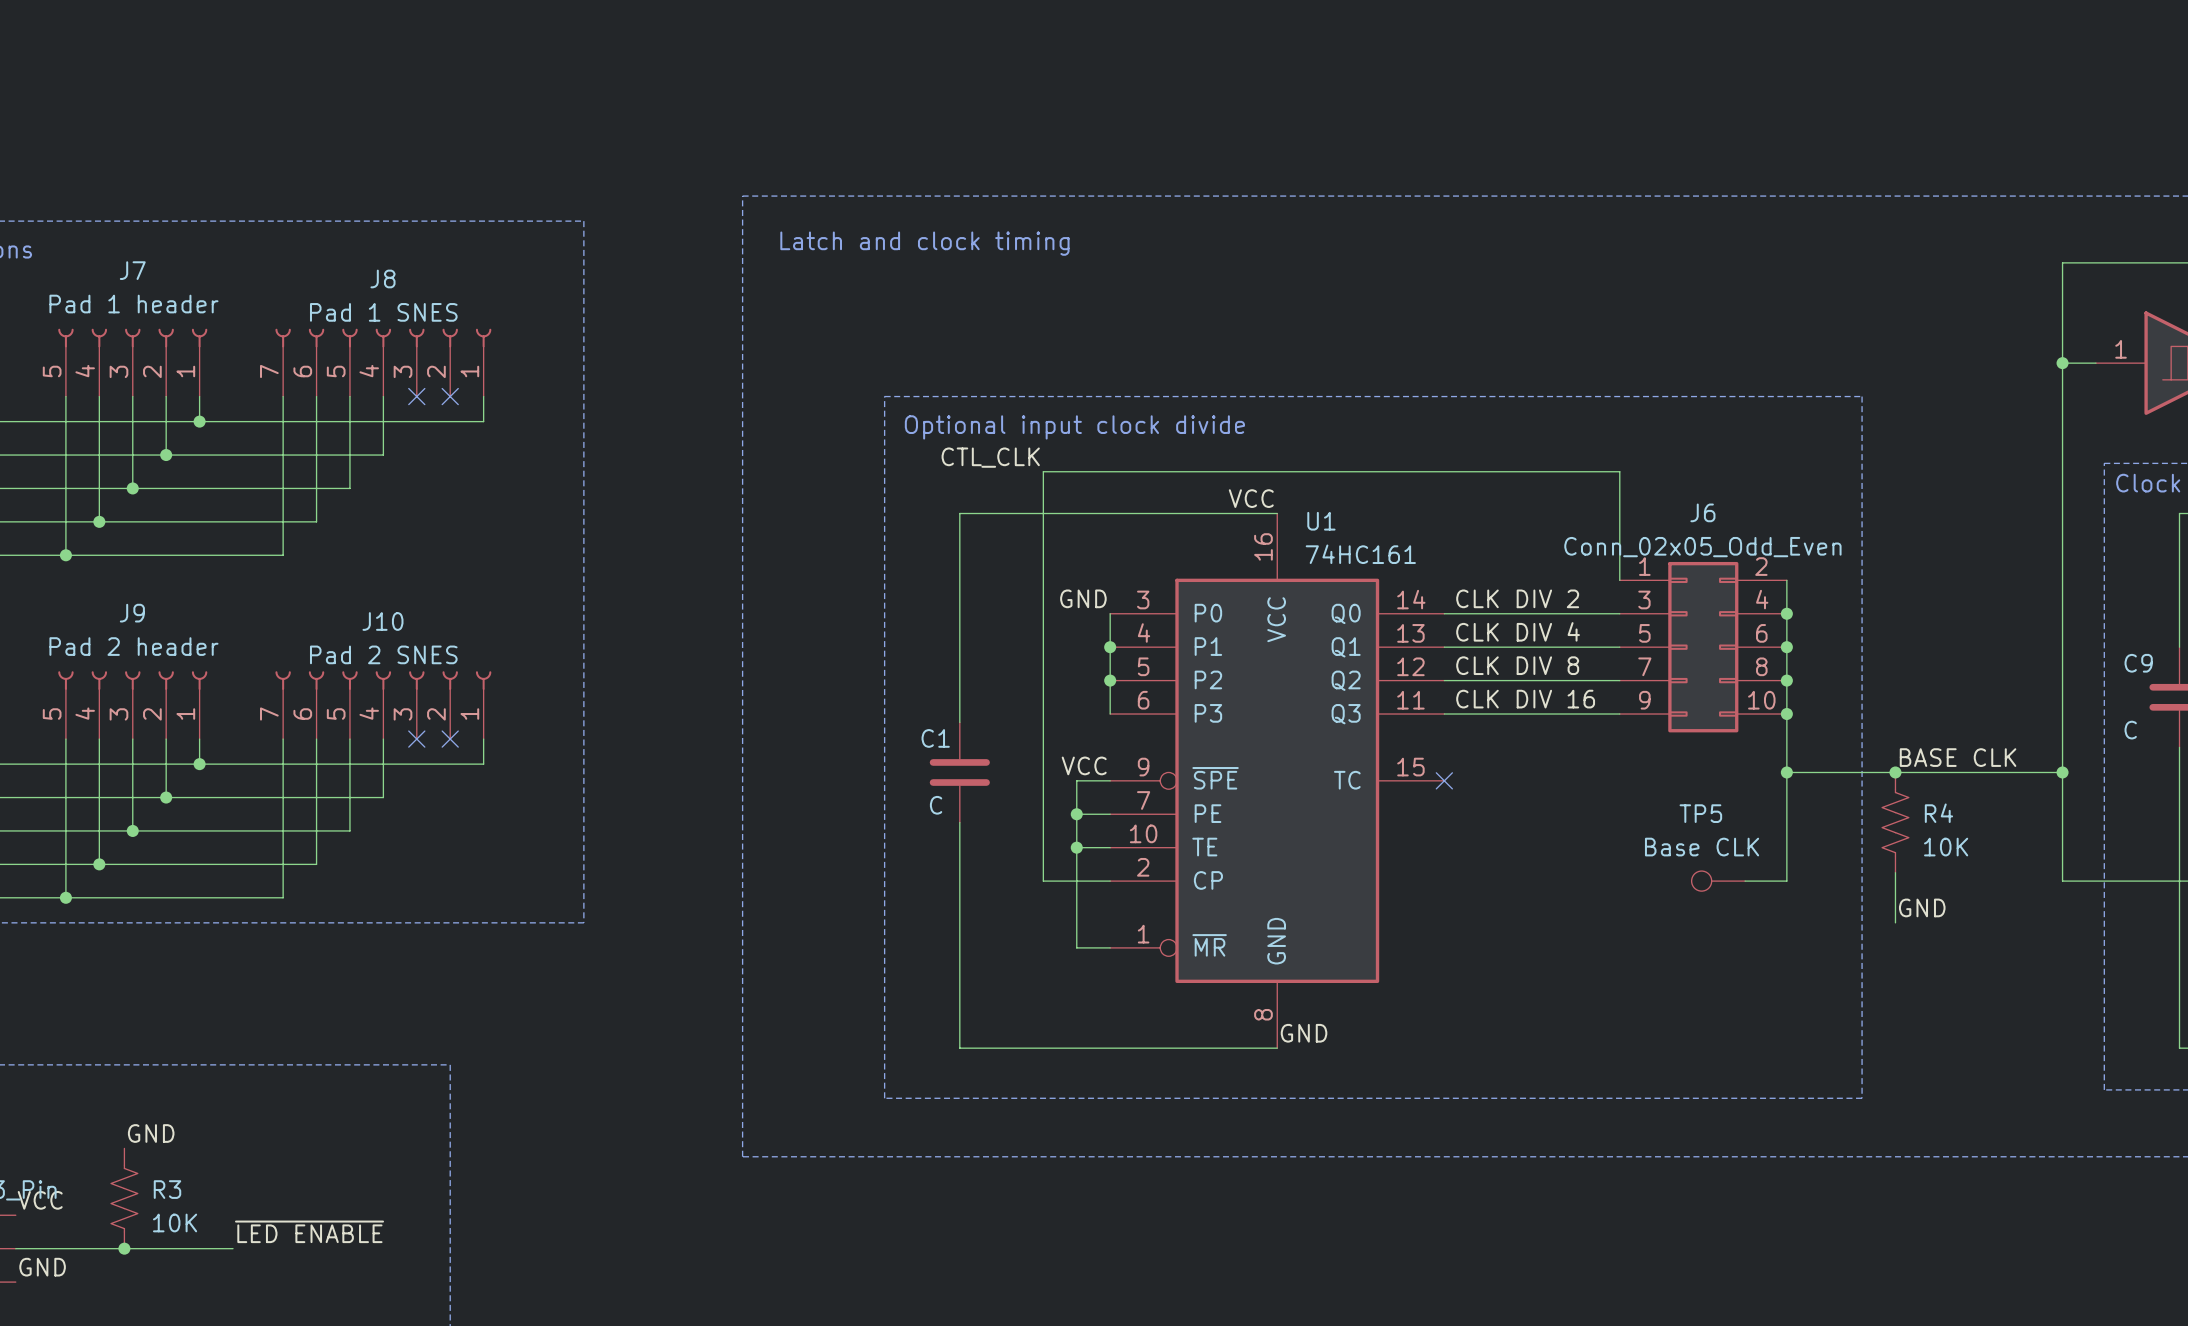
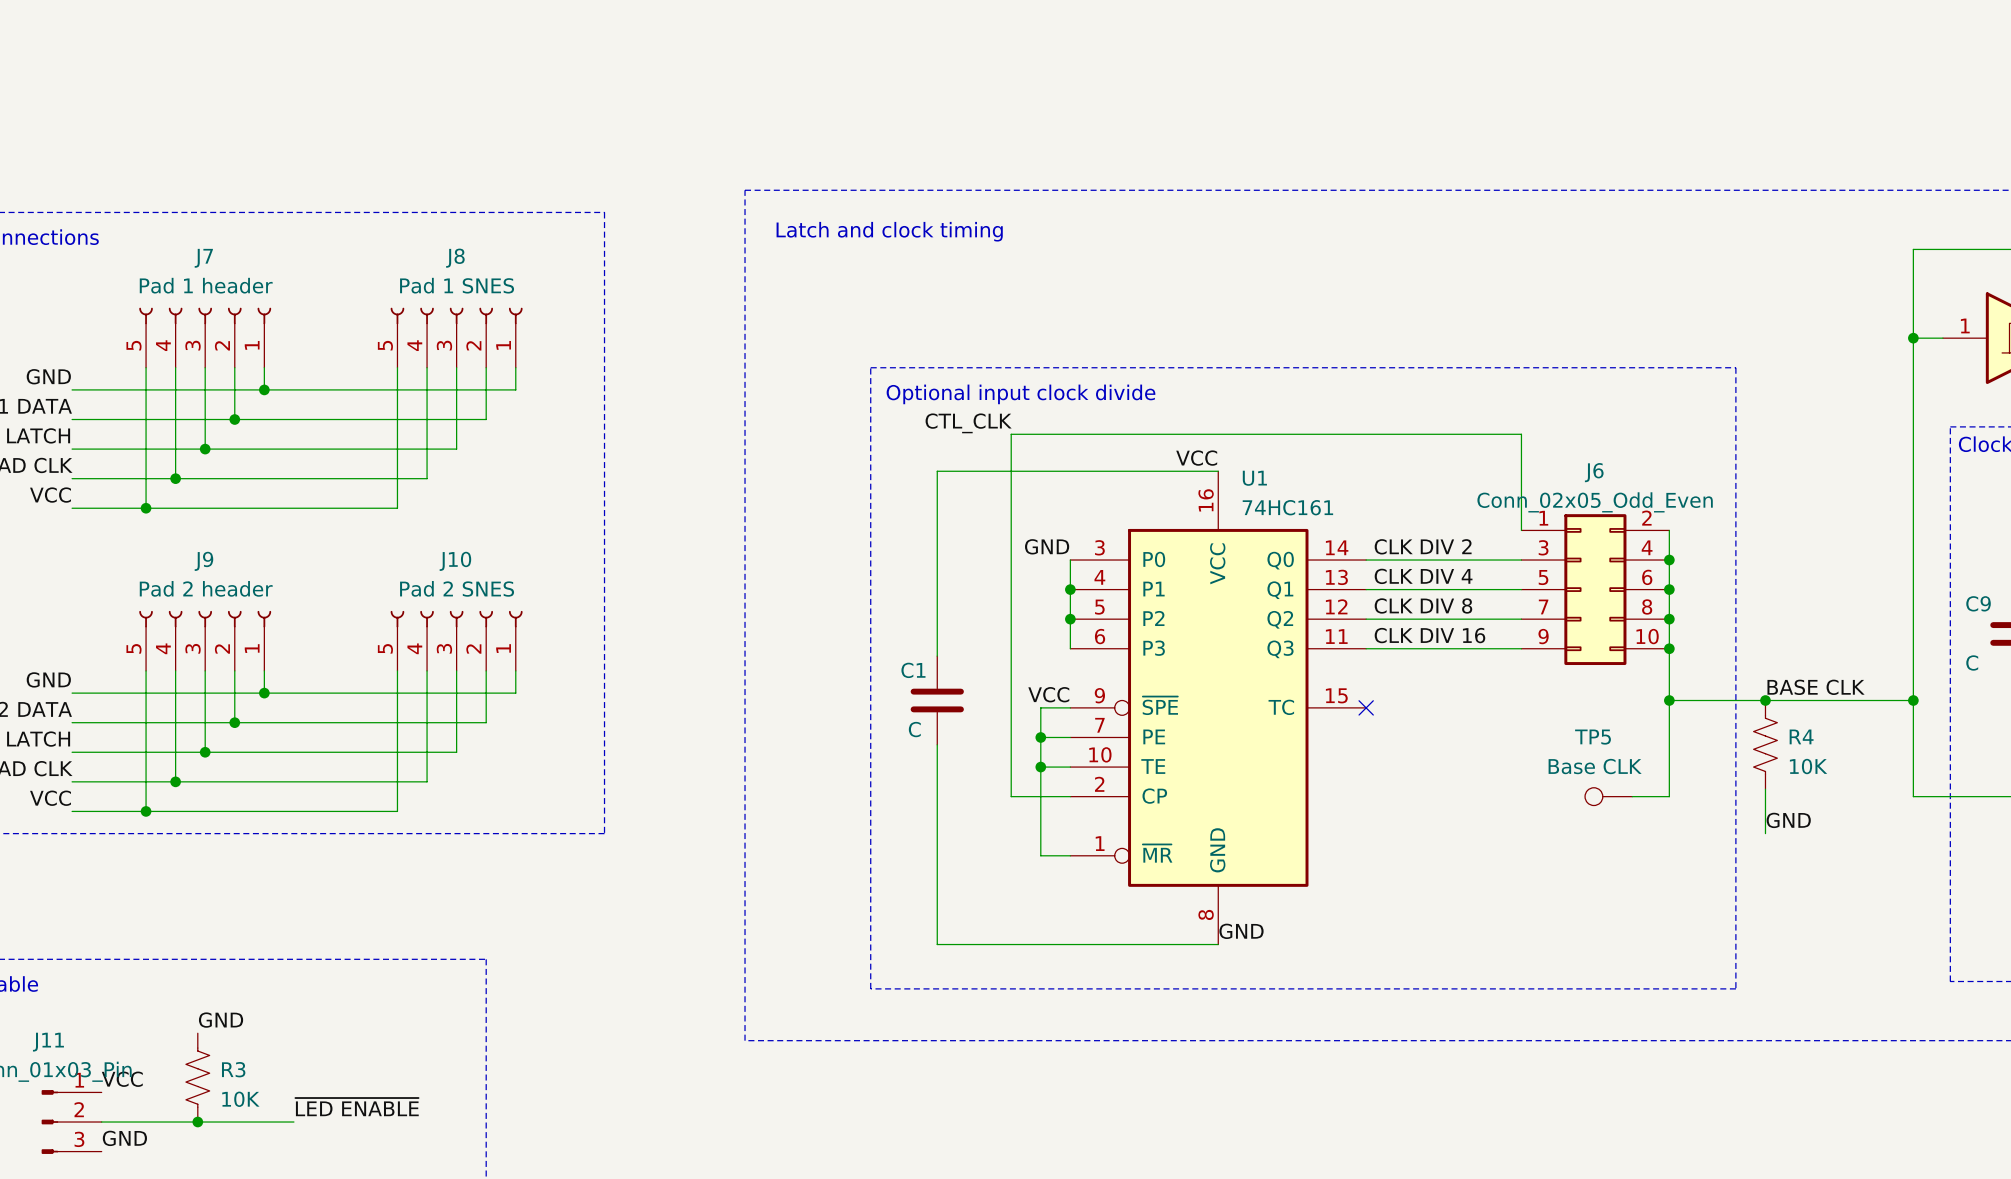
J8 symbol: [275, 328, 492, 397] -> [390, 307, 523, 368]
wire: (283, 396) (283, 555) -> (456, 367) (456, 449) (397, 449) (397, 508) (338, 508)
wire: (316, 396) (316, 521) -> (486, 367) (486, 419) (427, 419) (427, 478) (367, 478)
no-connect mark: (416, 396) -> none
no-connect mark: (450, 396) -> none
J10 symbol: [275, 671, 492, 740] -> [390, 610, 523, 671]
wire: (283, 739) (283, 897) -> (456, 670) (456, 752) (397, 752) (397, 811) (338, 811)
wire: (316, 739) (316, 864) -> (486, 670) (486, 722) (427, 722) (427, 781) (367, 781)
no-connect mark: (416, 739) -> none
no-connect mark: (450, 739) -> none

